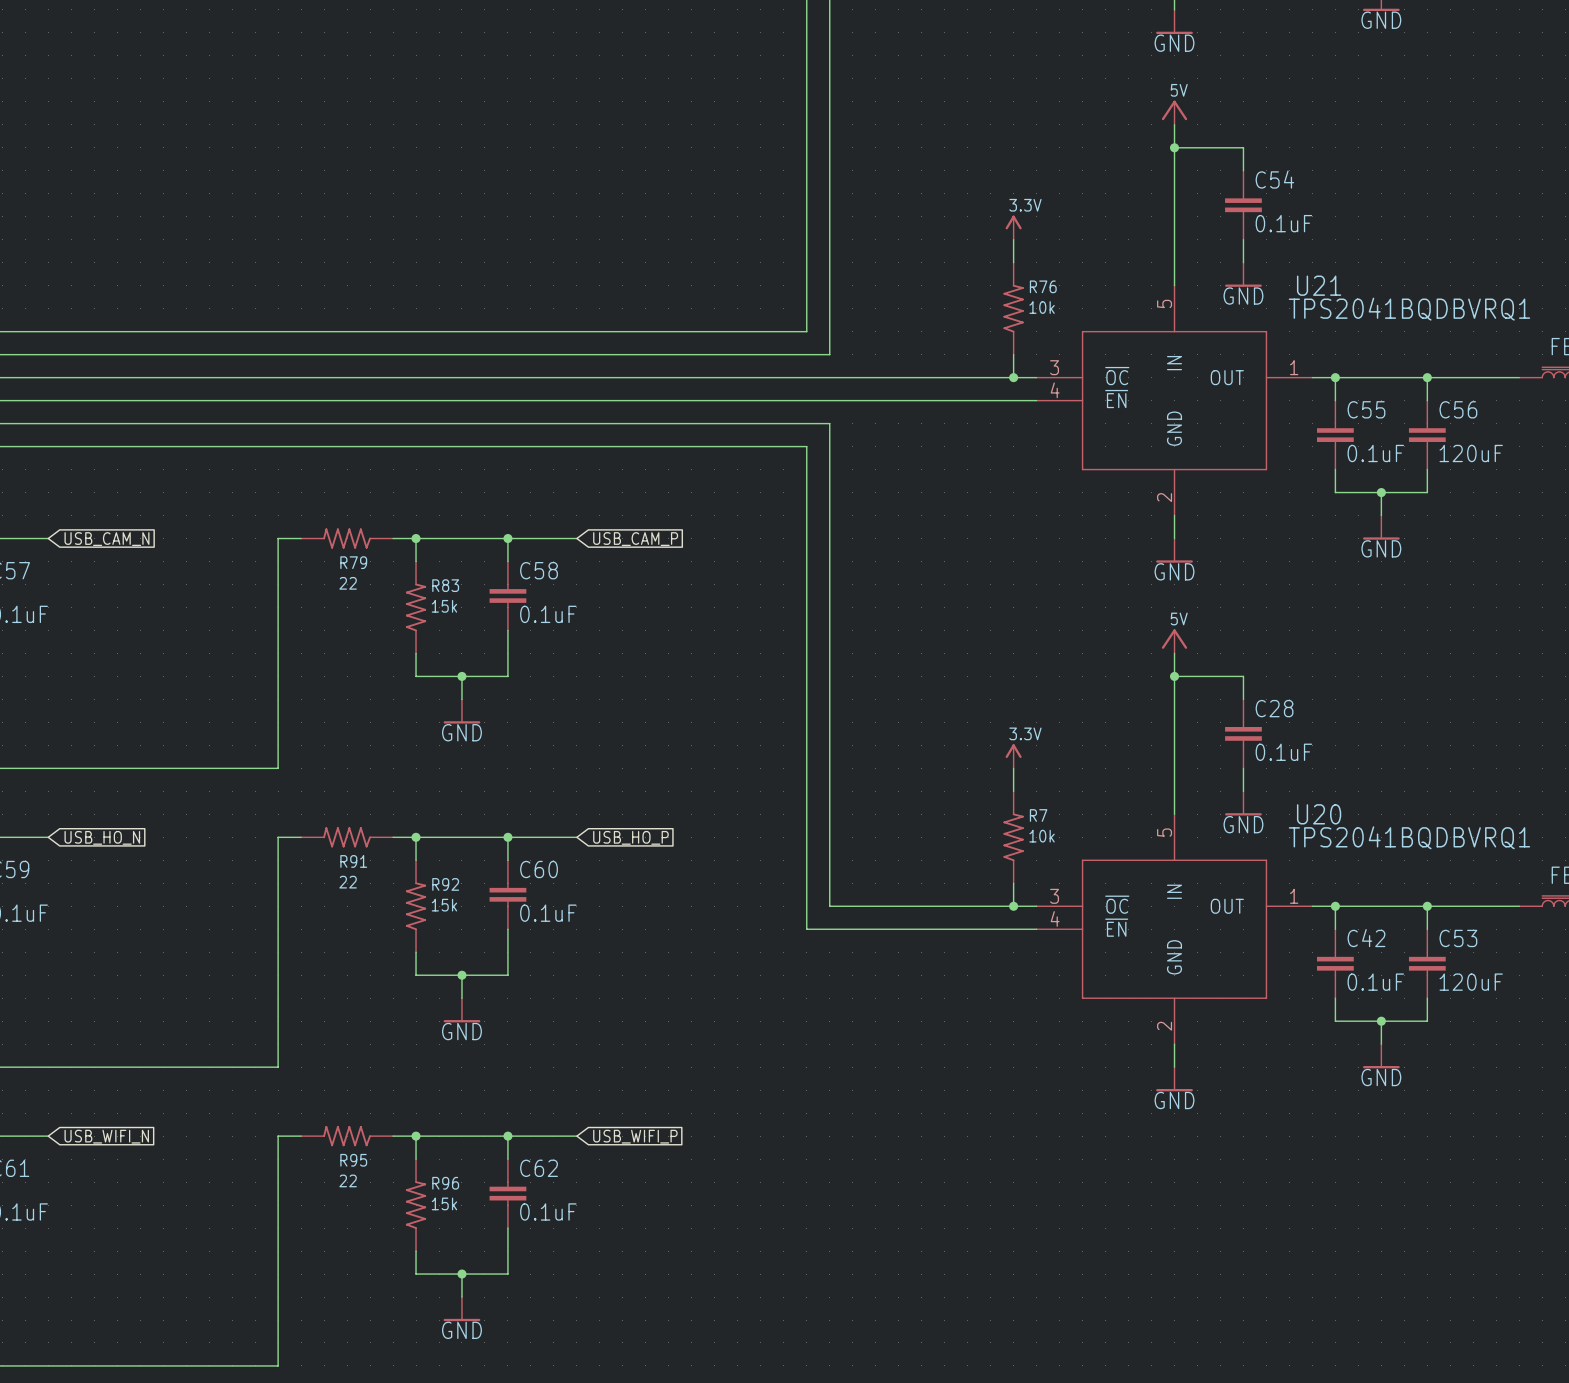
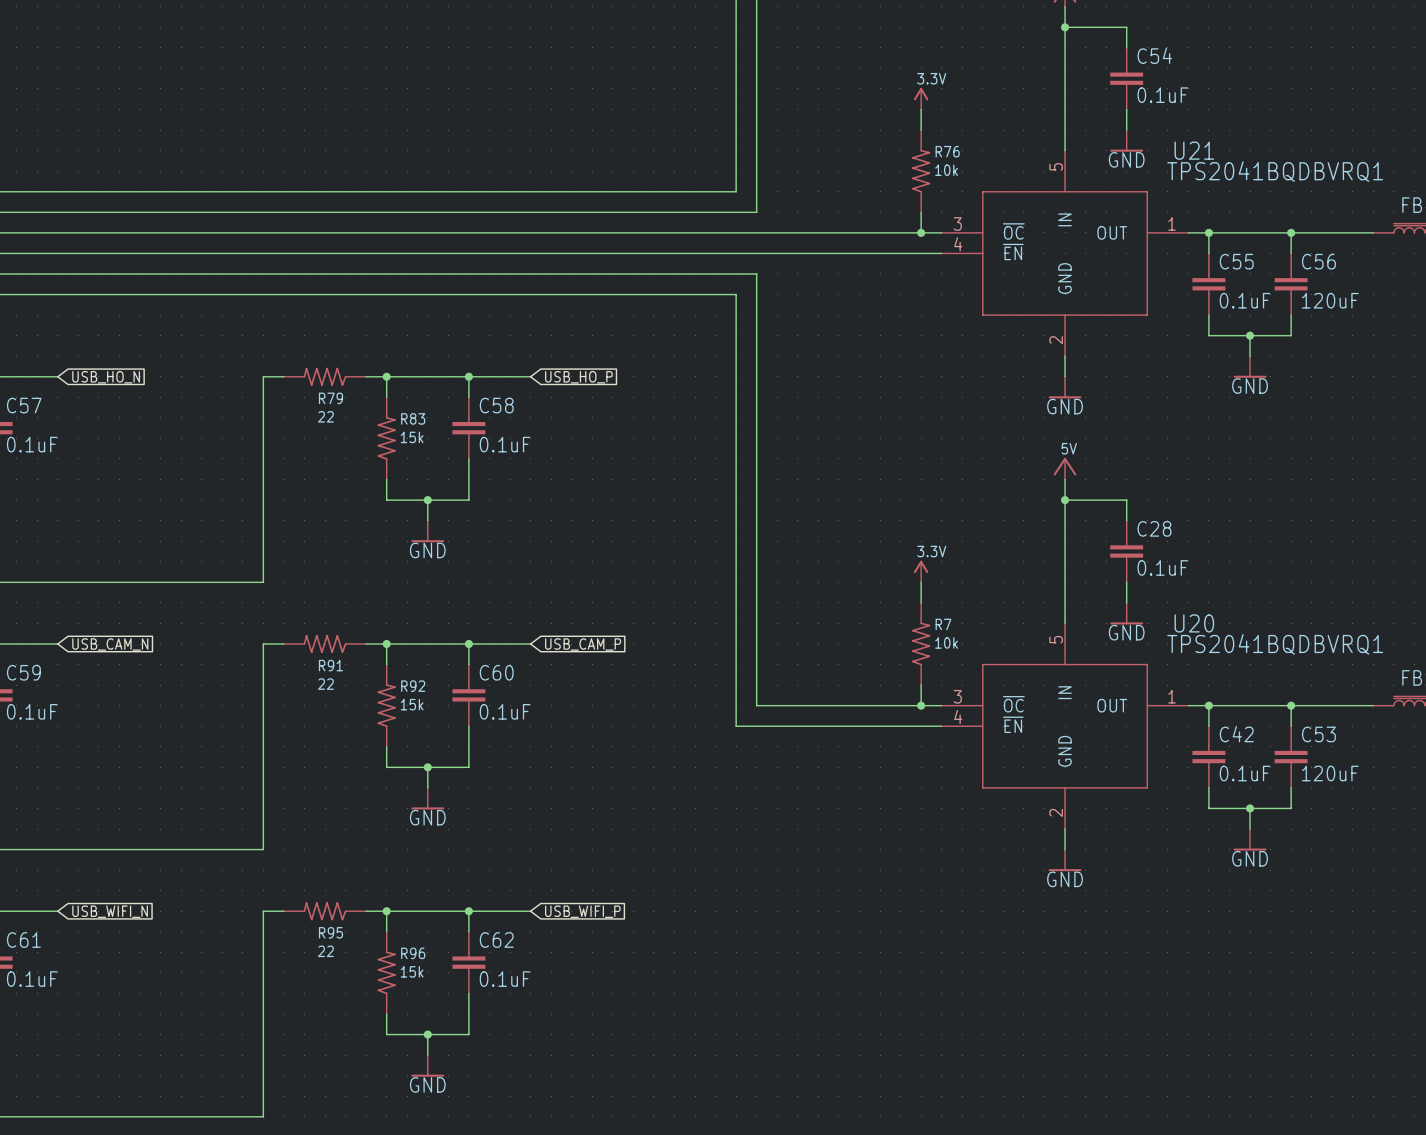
global label: USB_CAM_N (106, 539) -> USB_HO_N (106, 377)
global label: USB_CAM_P (635, 539) -> USB_HO_P (578, 377)
global label: USB_HO_N (102, 837) -> USB_CAM_N (110, 644)
global label: USB_HO_P (630, 837) -> USB_CAM_P (583, 644)

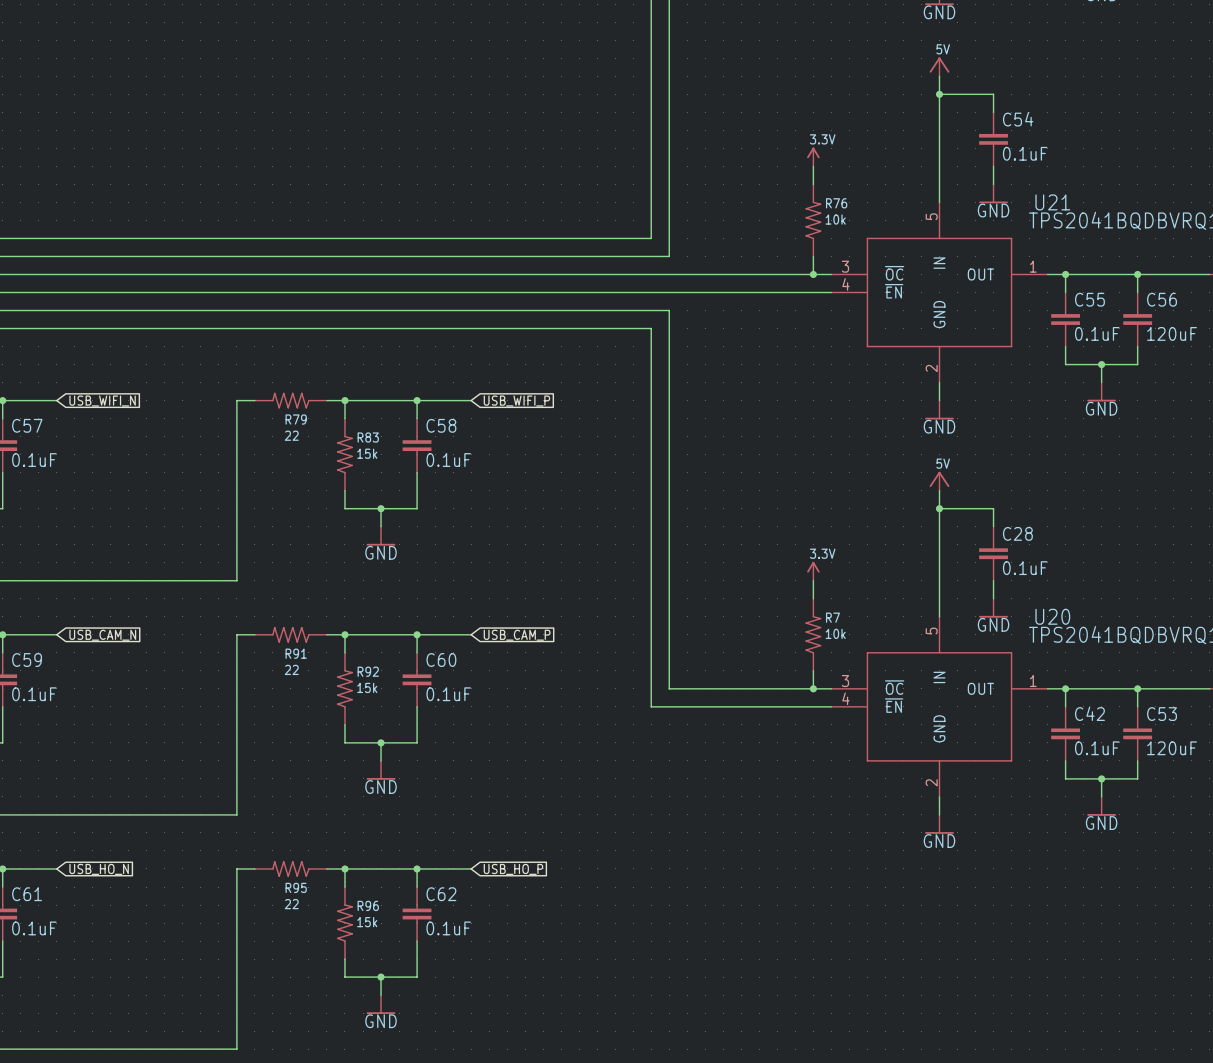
global label: USB_HO_N (106, 377) -> USB_WIFI_N (102, 401)
global label: USB_HO_P (578, 377) -> USB_WIFI_P (516, 401)
global label: USB_WIFI_N (110, 911) -> USB_HO_N (99, 869)
global label: USB_WIFI_P (582, 911) -> USB_HO_P (513, 869)

